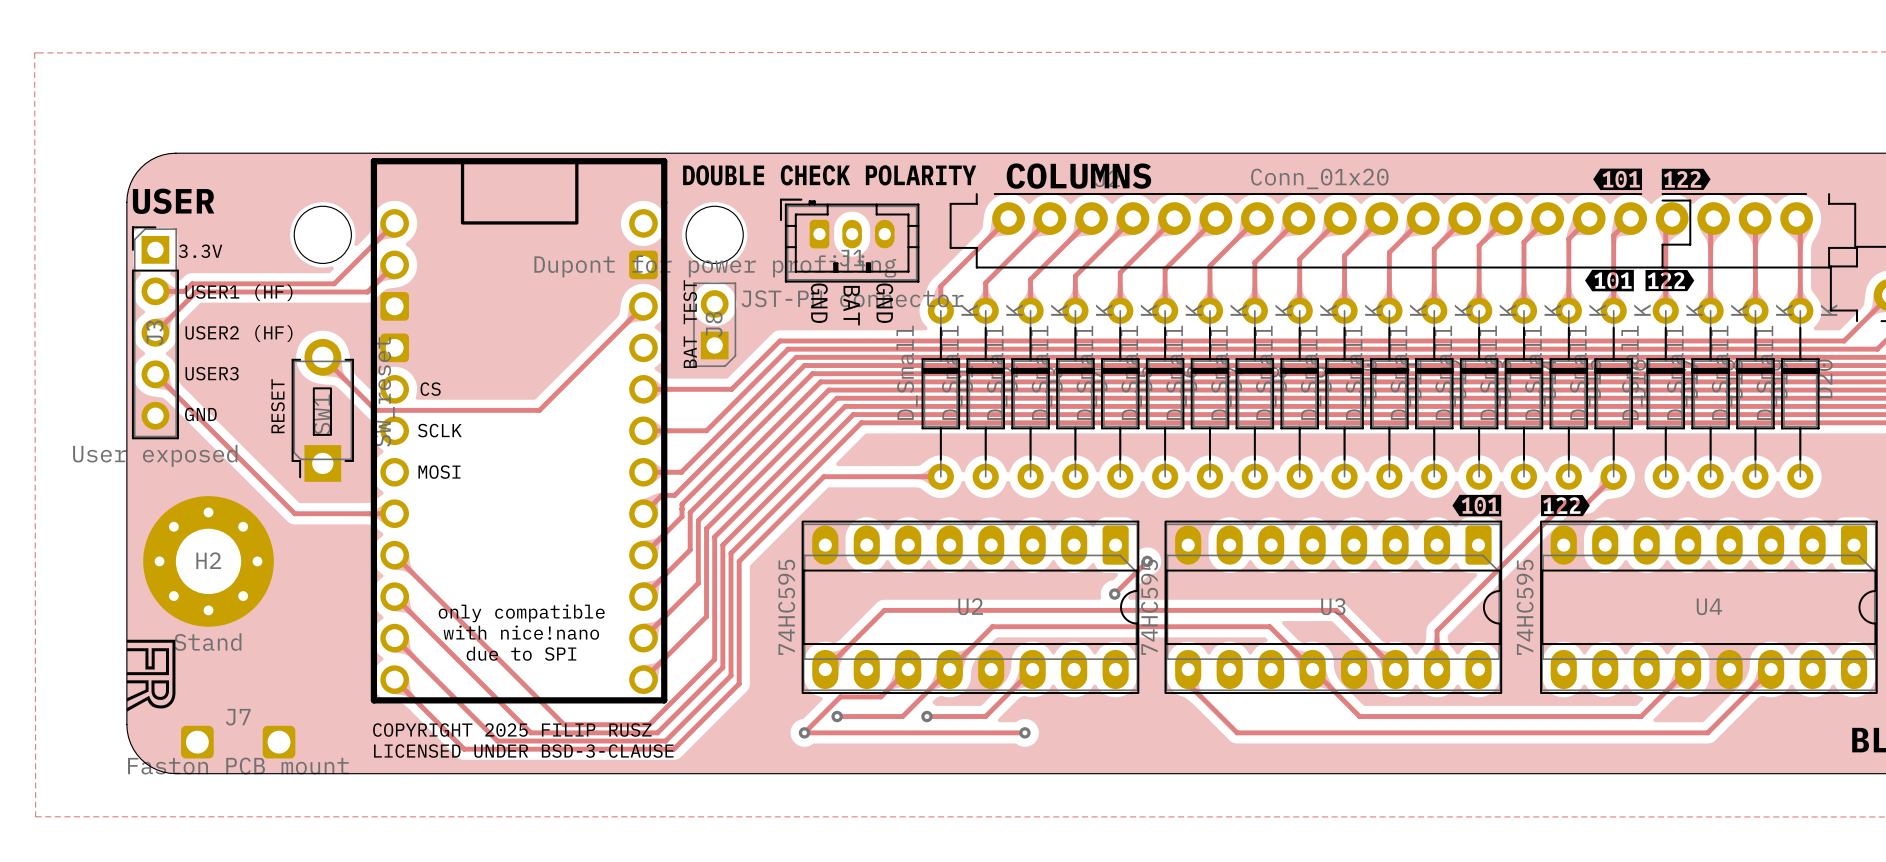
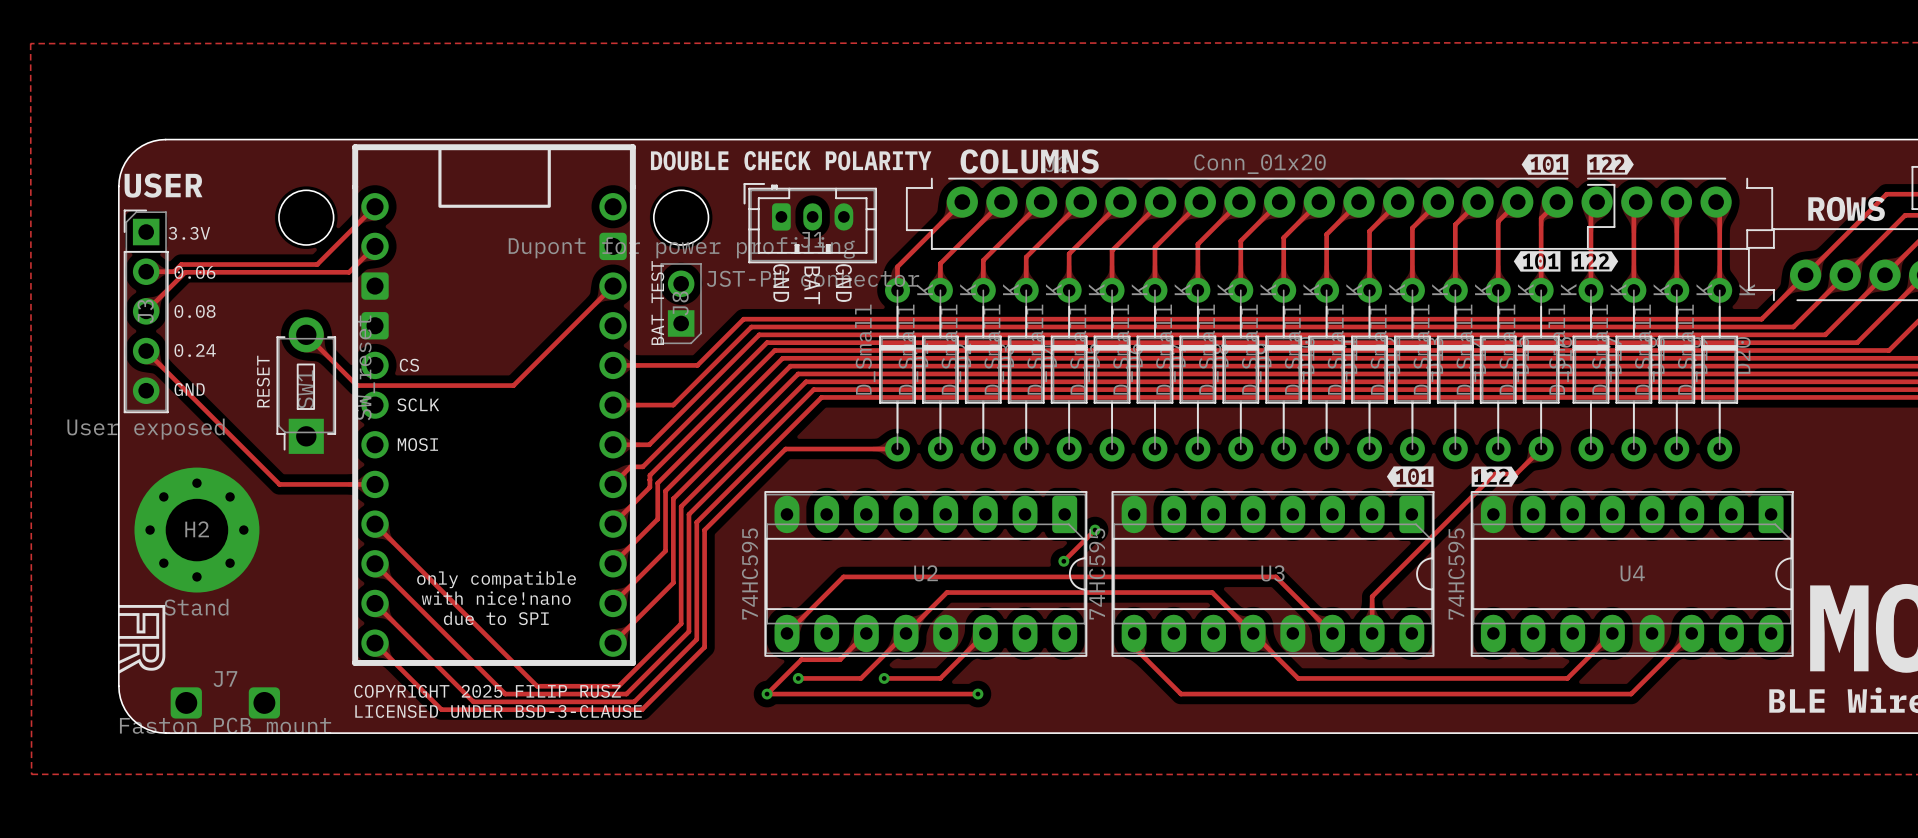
text: USER1 (HF) (239, 292) -> 0.06 (194, 272)
text: USER2 (HF) (239, 333) -> 0.08 (195, 311)
text: USER3 (212, 373) -> 0.24 (195, 350)

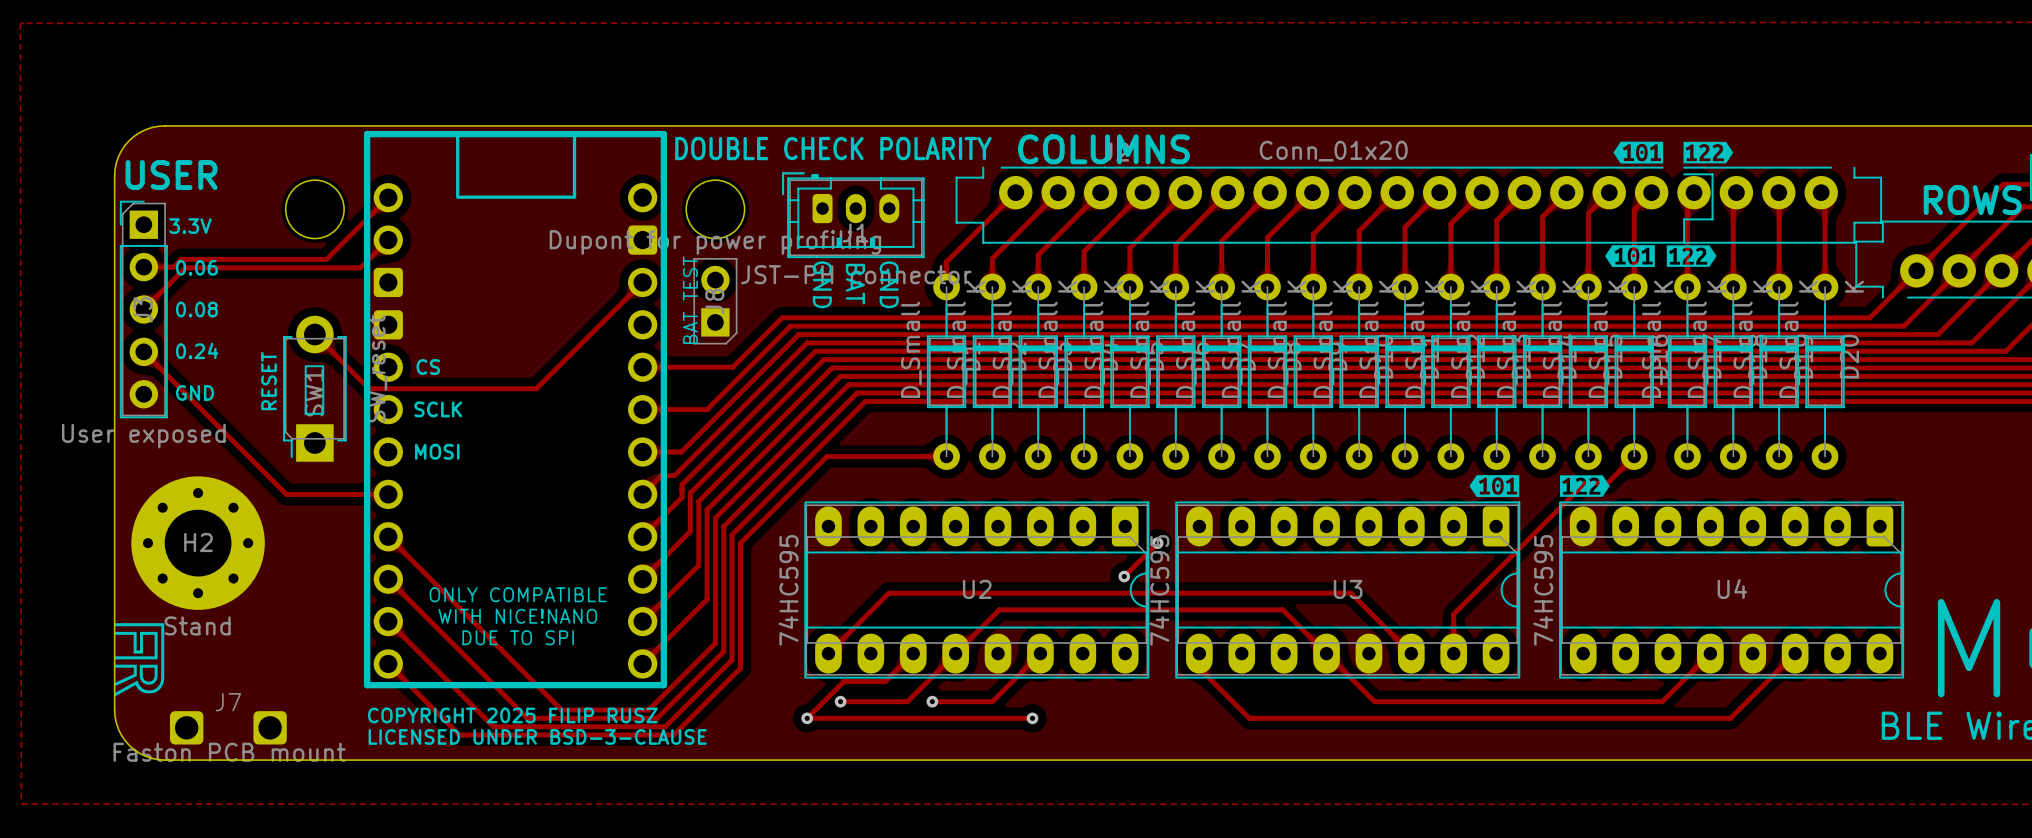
text: only compatible (496, 579) -> ONLY COMPATIBLE (518, 594)
text: with nice!nano (496, 598) -> WITH NICE!NANO (517, 616)
text: due to SPI (496, 618) -> DUE TO SPI (518, 637)

